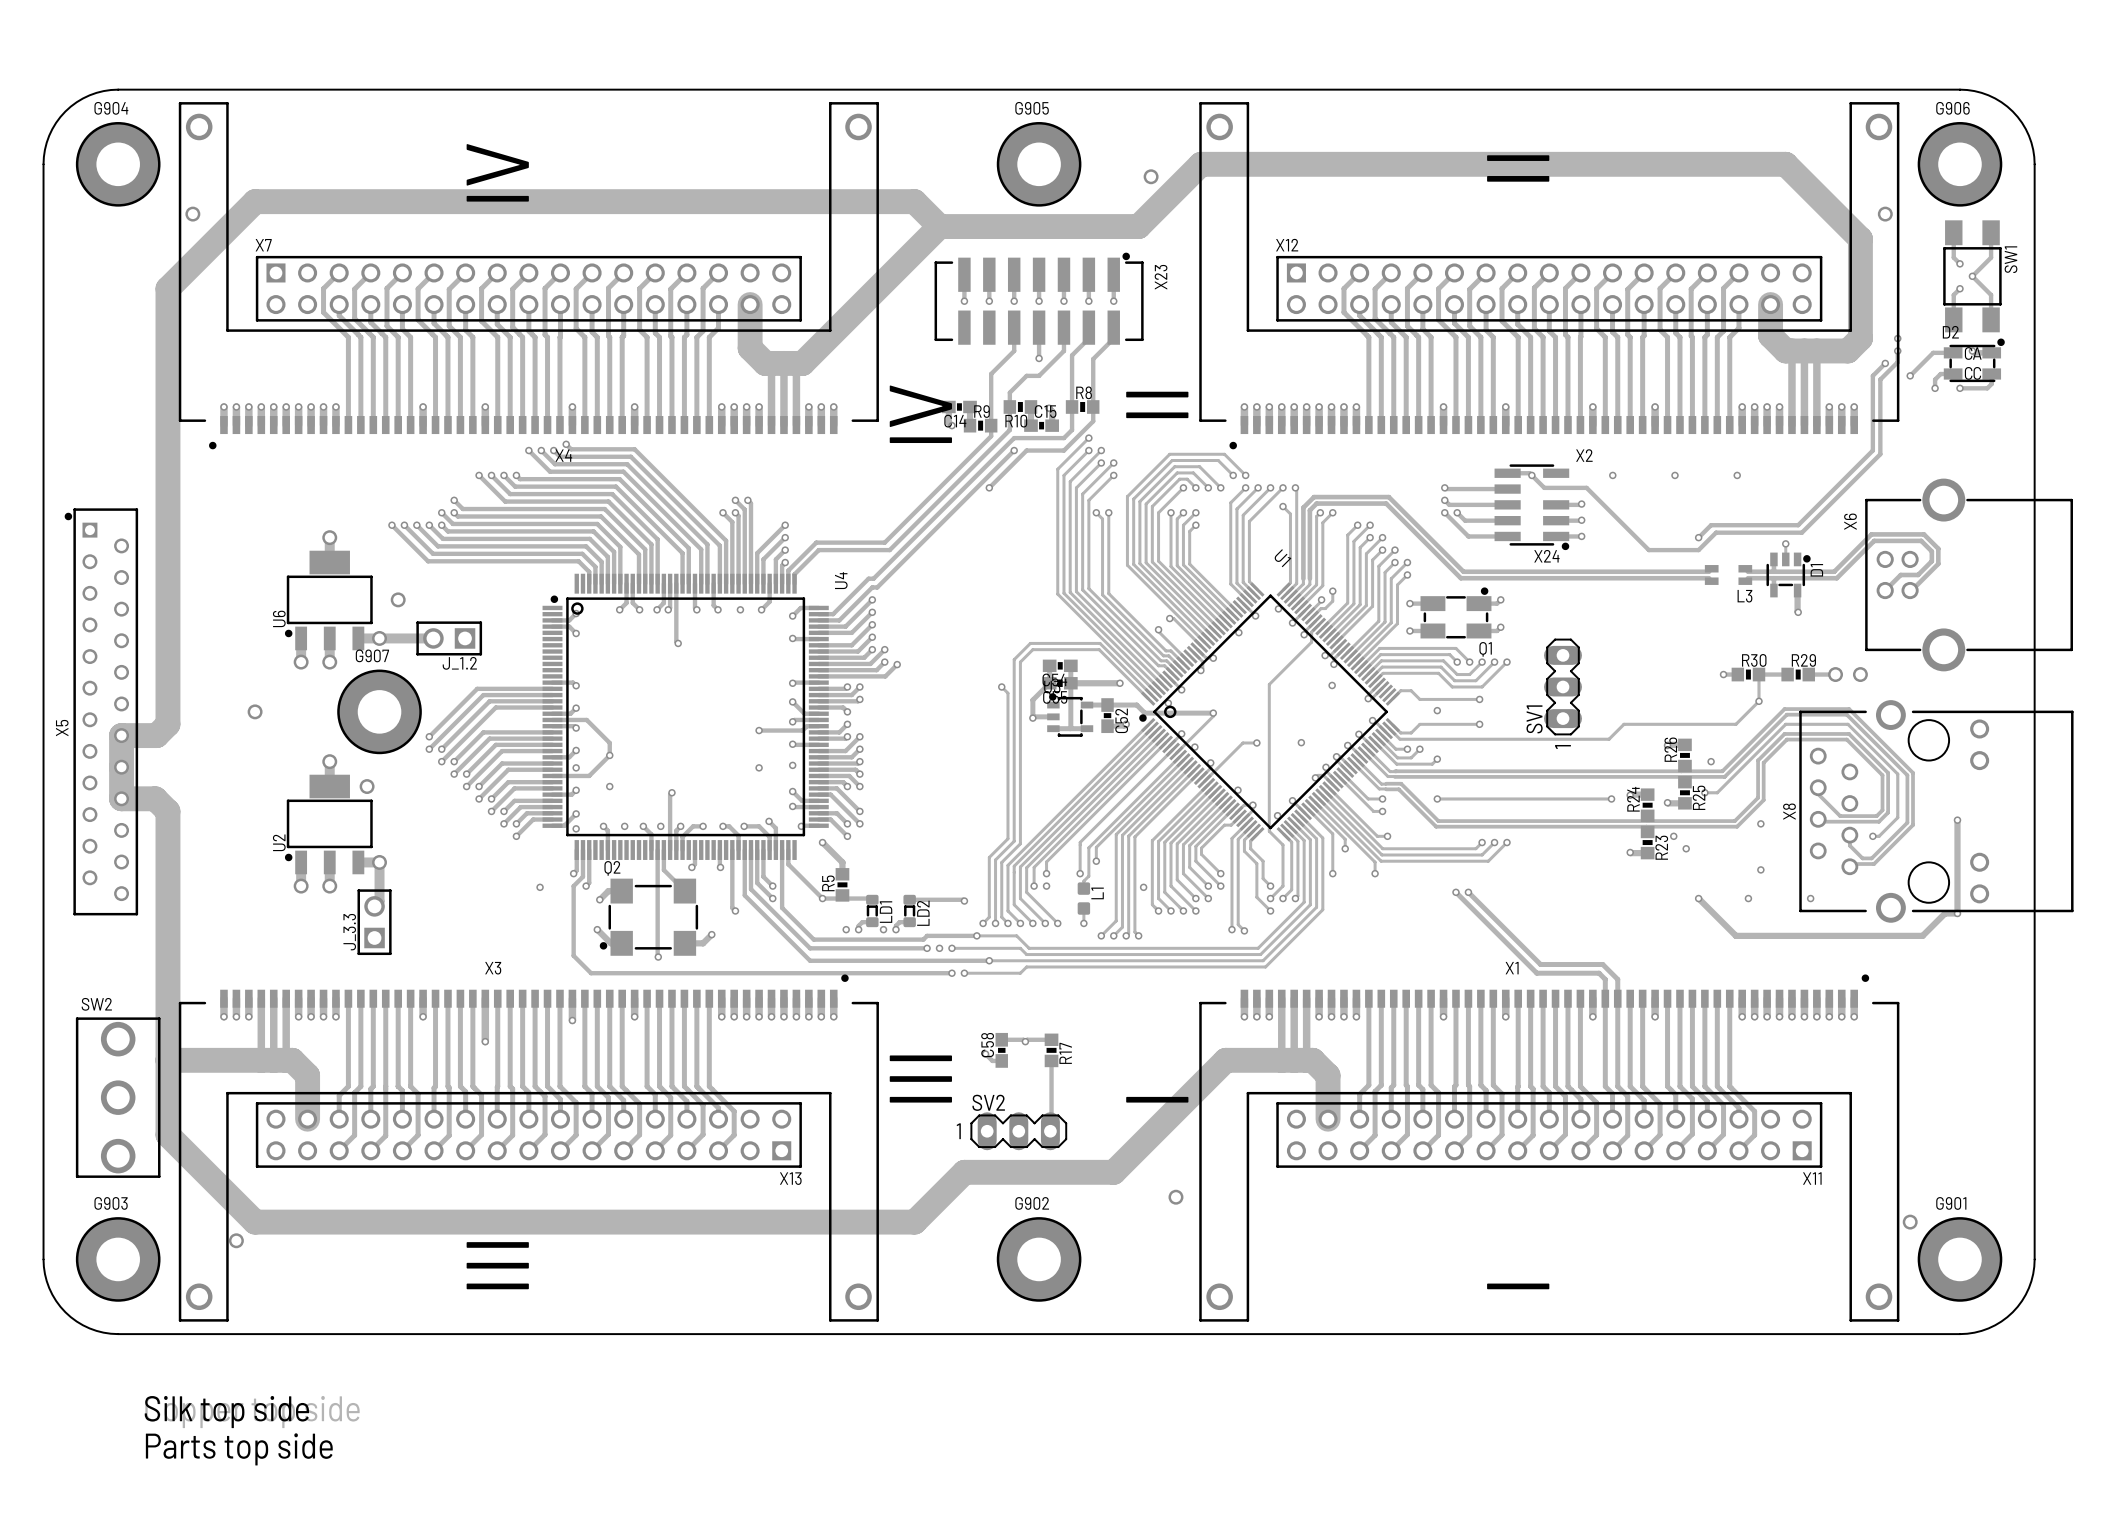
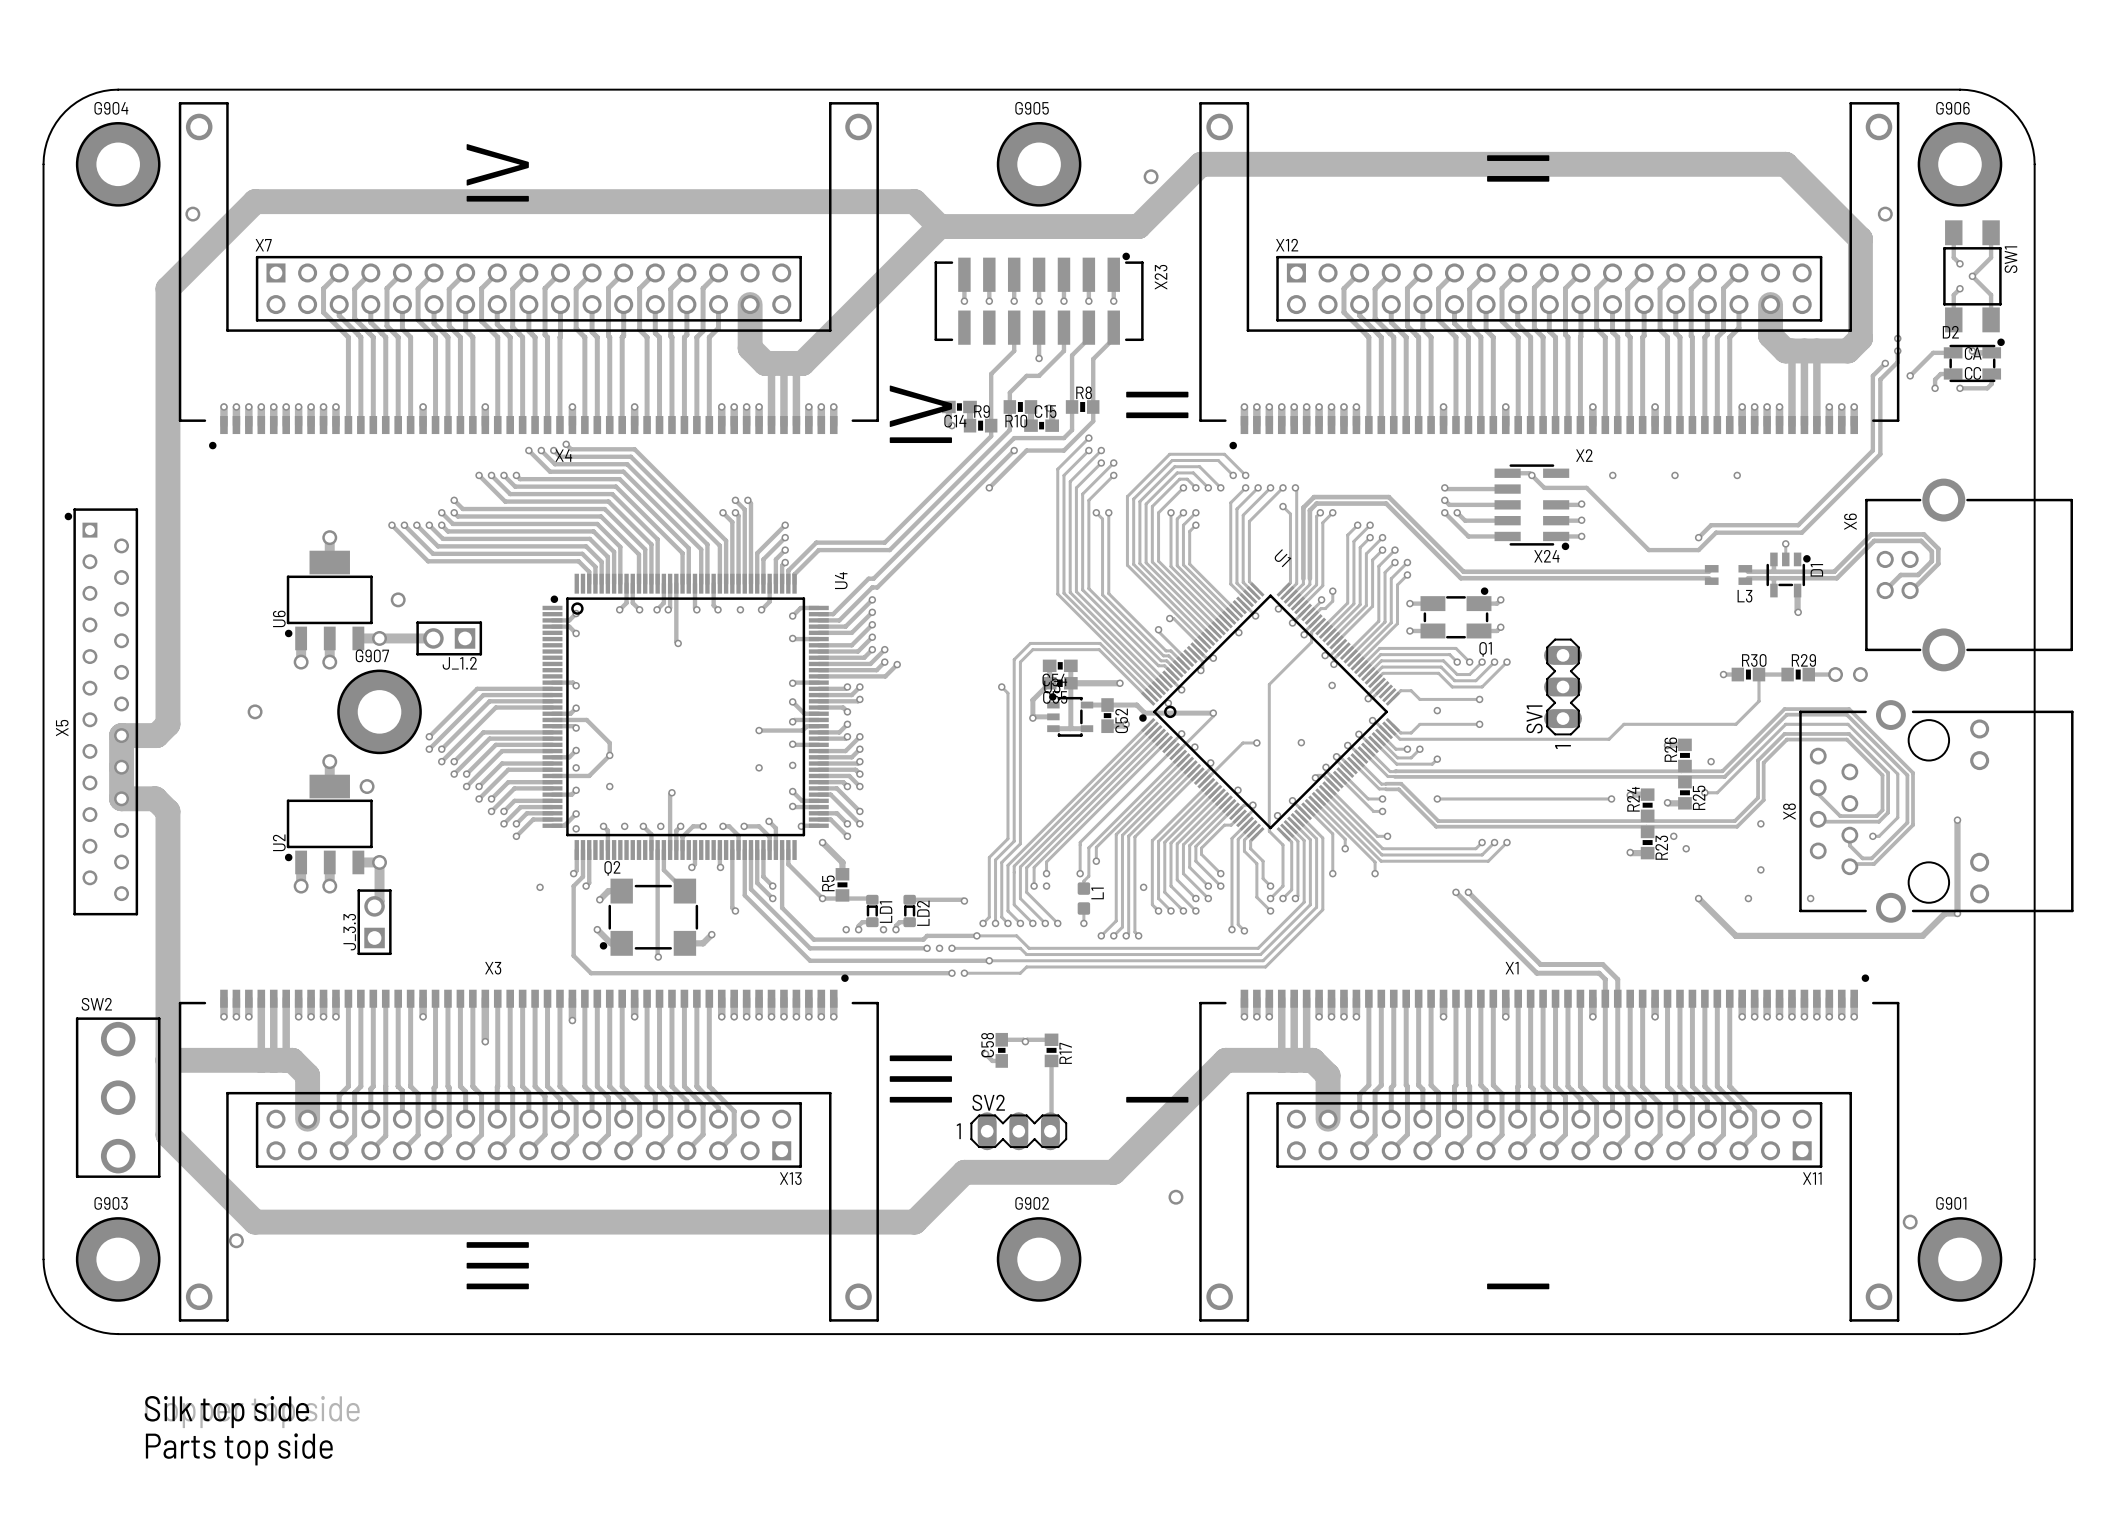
via: (1759, 701) -> none

